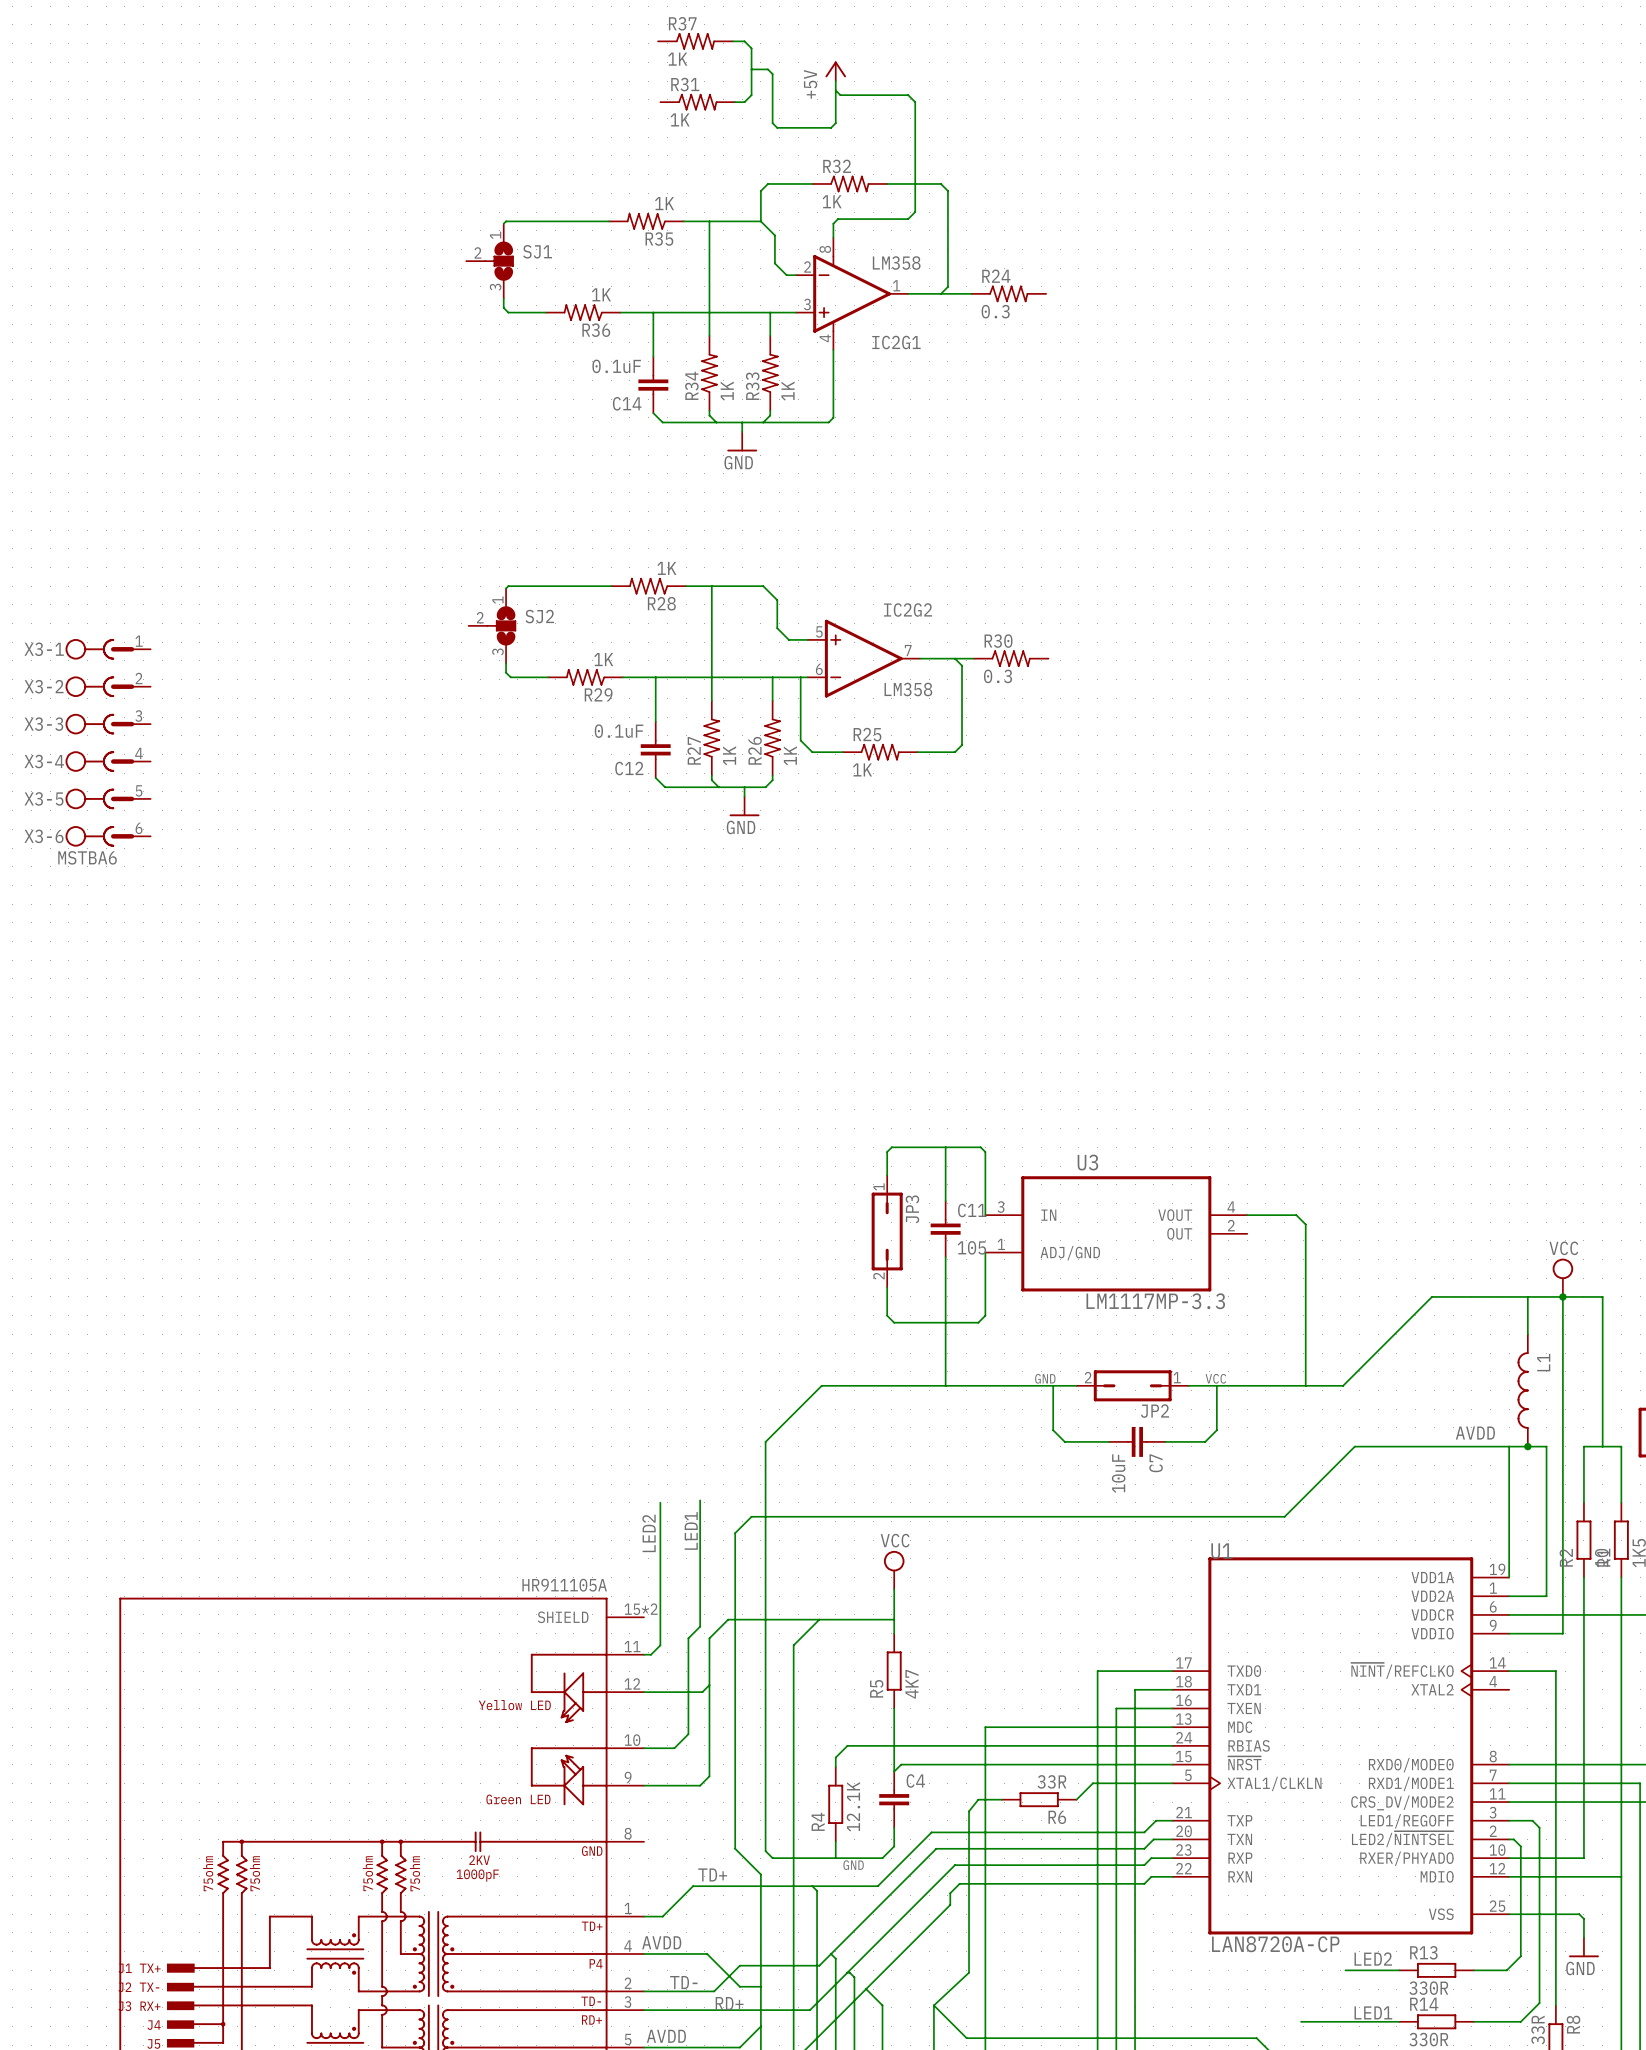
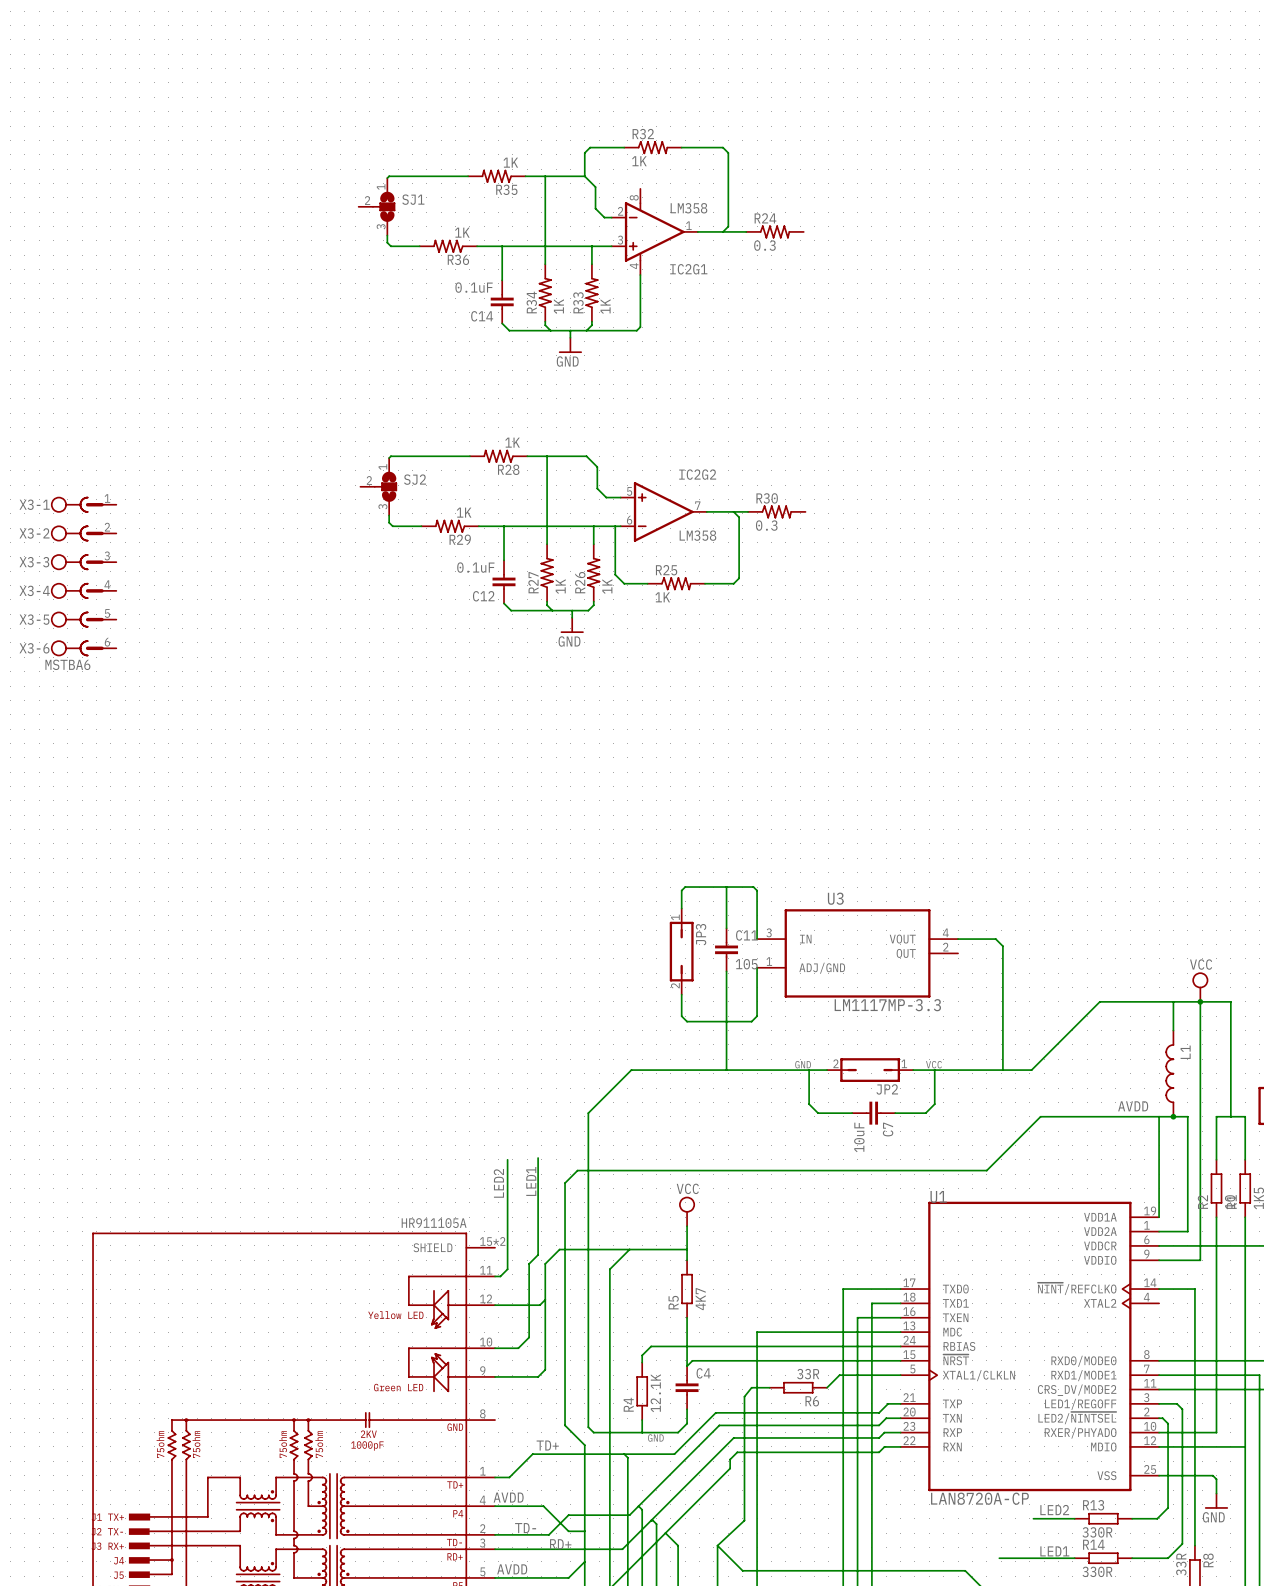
R37: 1K (695, 41) -> none
wire: (732, 41) (744, 41) (751, 48) (751, 95) (744, 102) (735, 102) -> none
wire: (751, 69) (767, 69) (772, 74) (772, 123) (777, 127) (831, 127) (835, 123) (835, 81) -> none
power symbol: +5V (835, 71) -> none
wire: (835, 90) (840, 95) (908, 95) (915, 102) (915, 212) (908, 219) (838, 219) (833, 223) (833, 237) -> none
R31: 1K (697, 102) -> none

